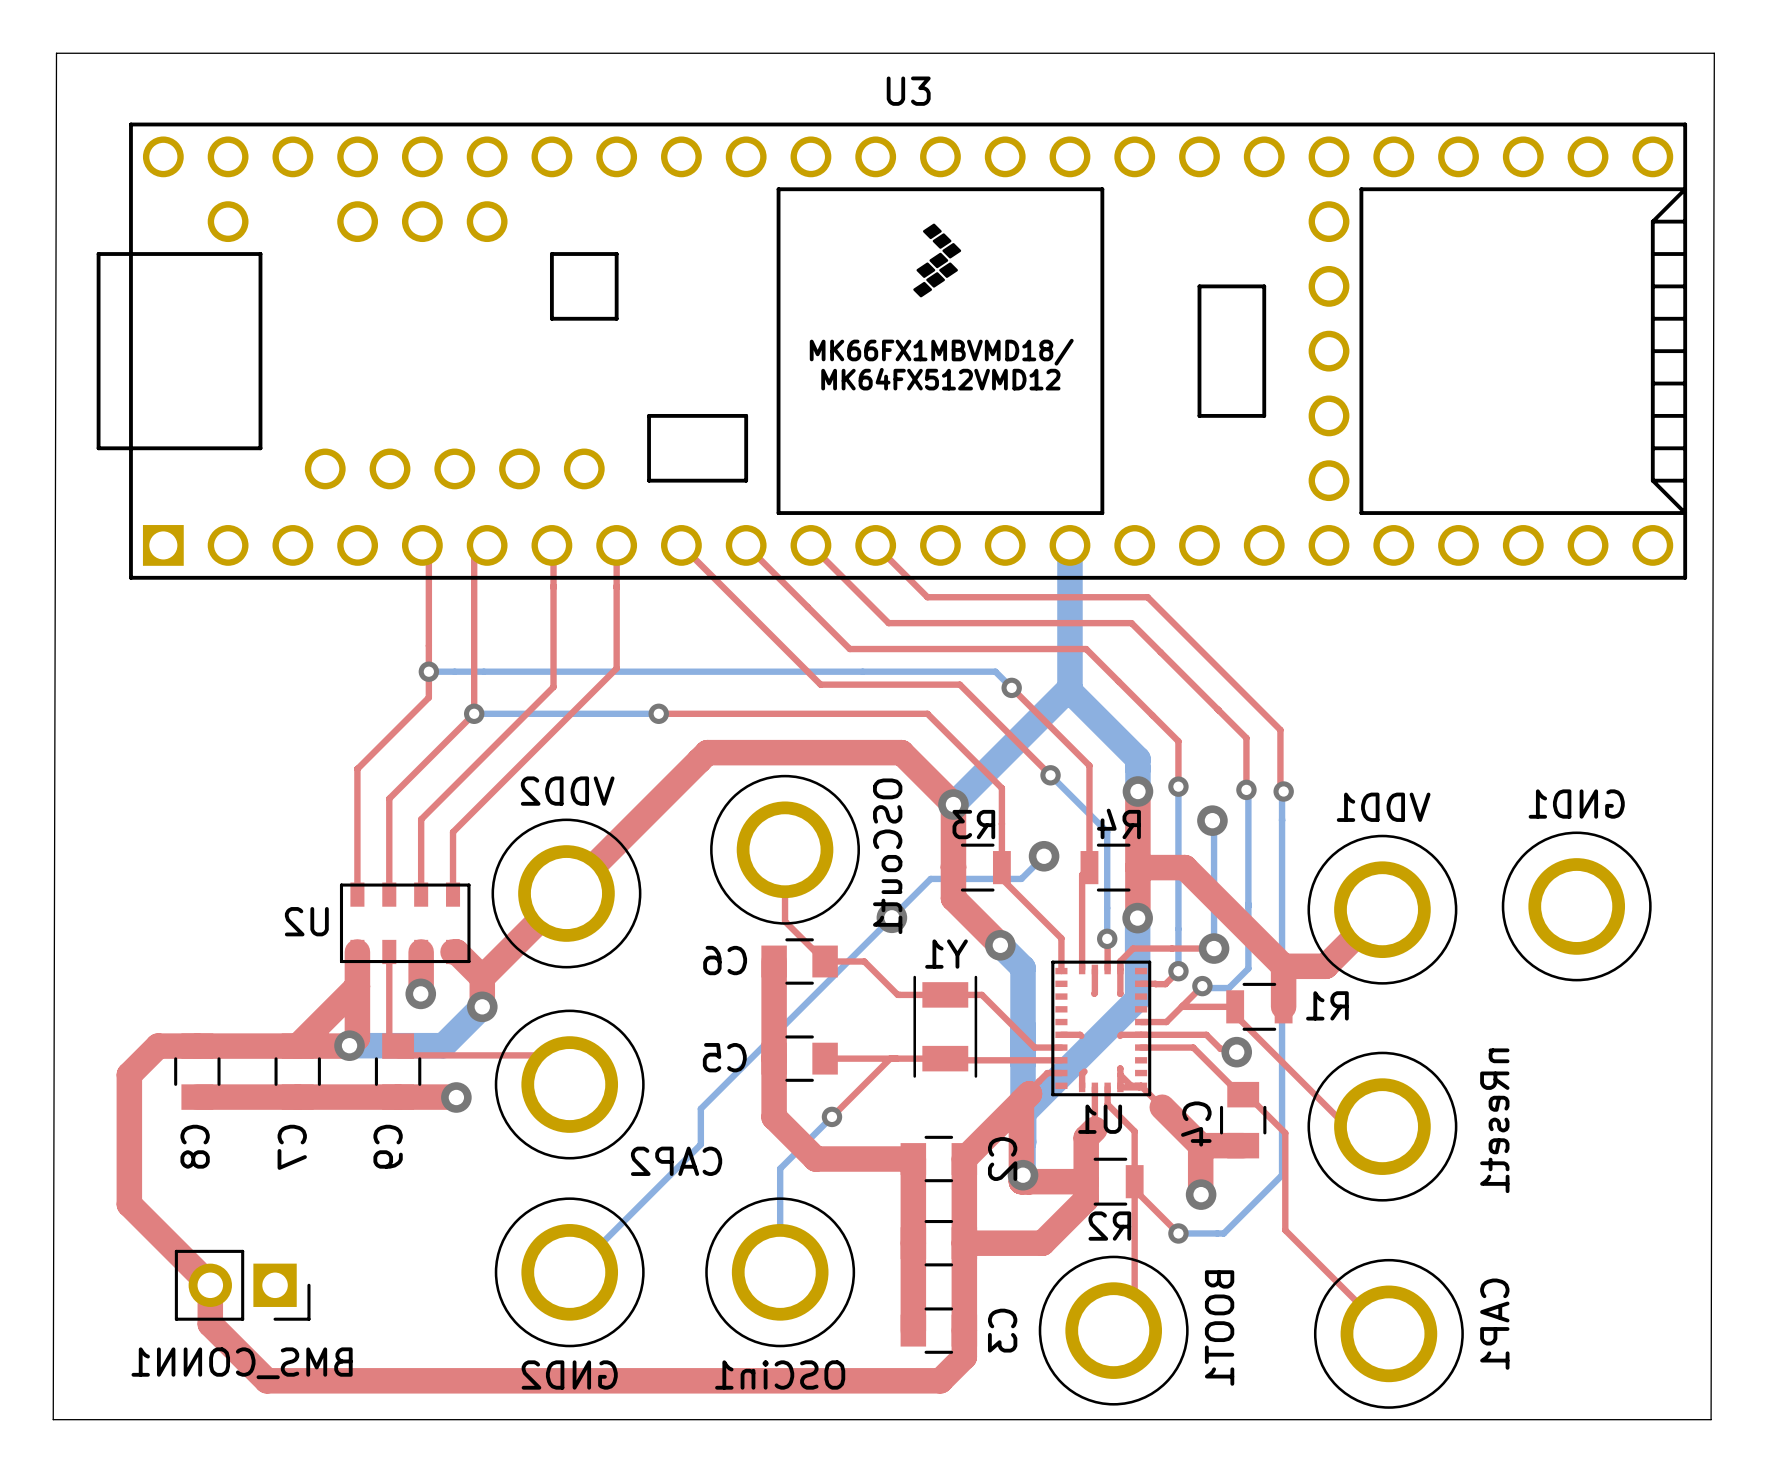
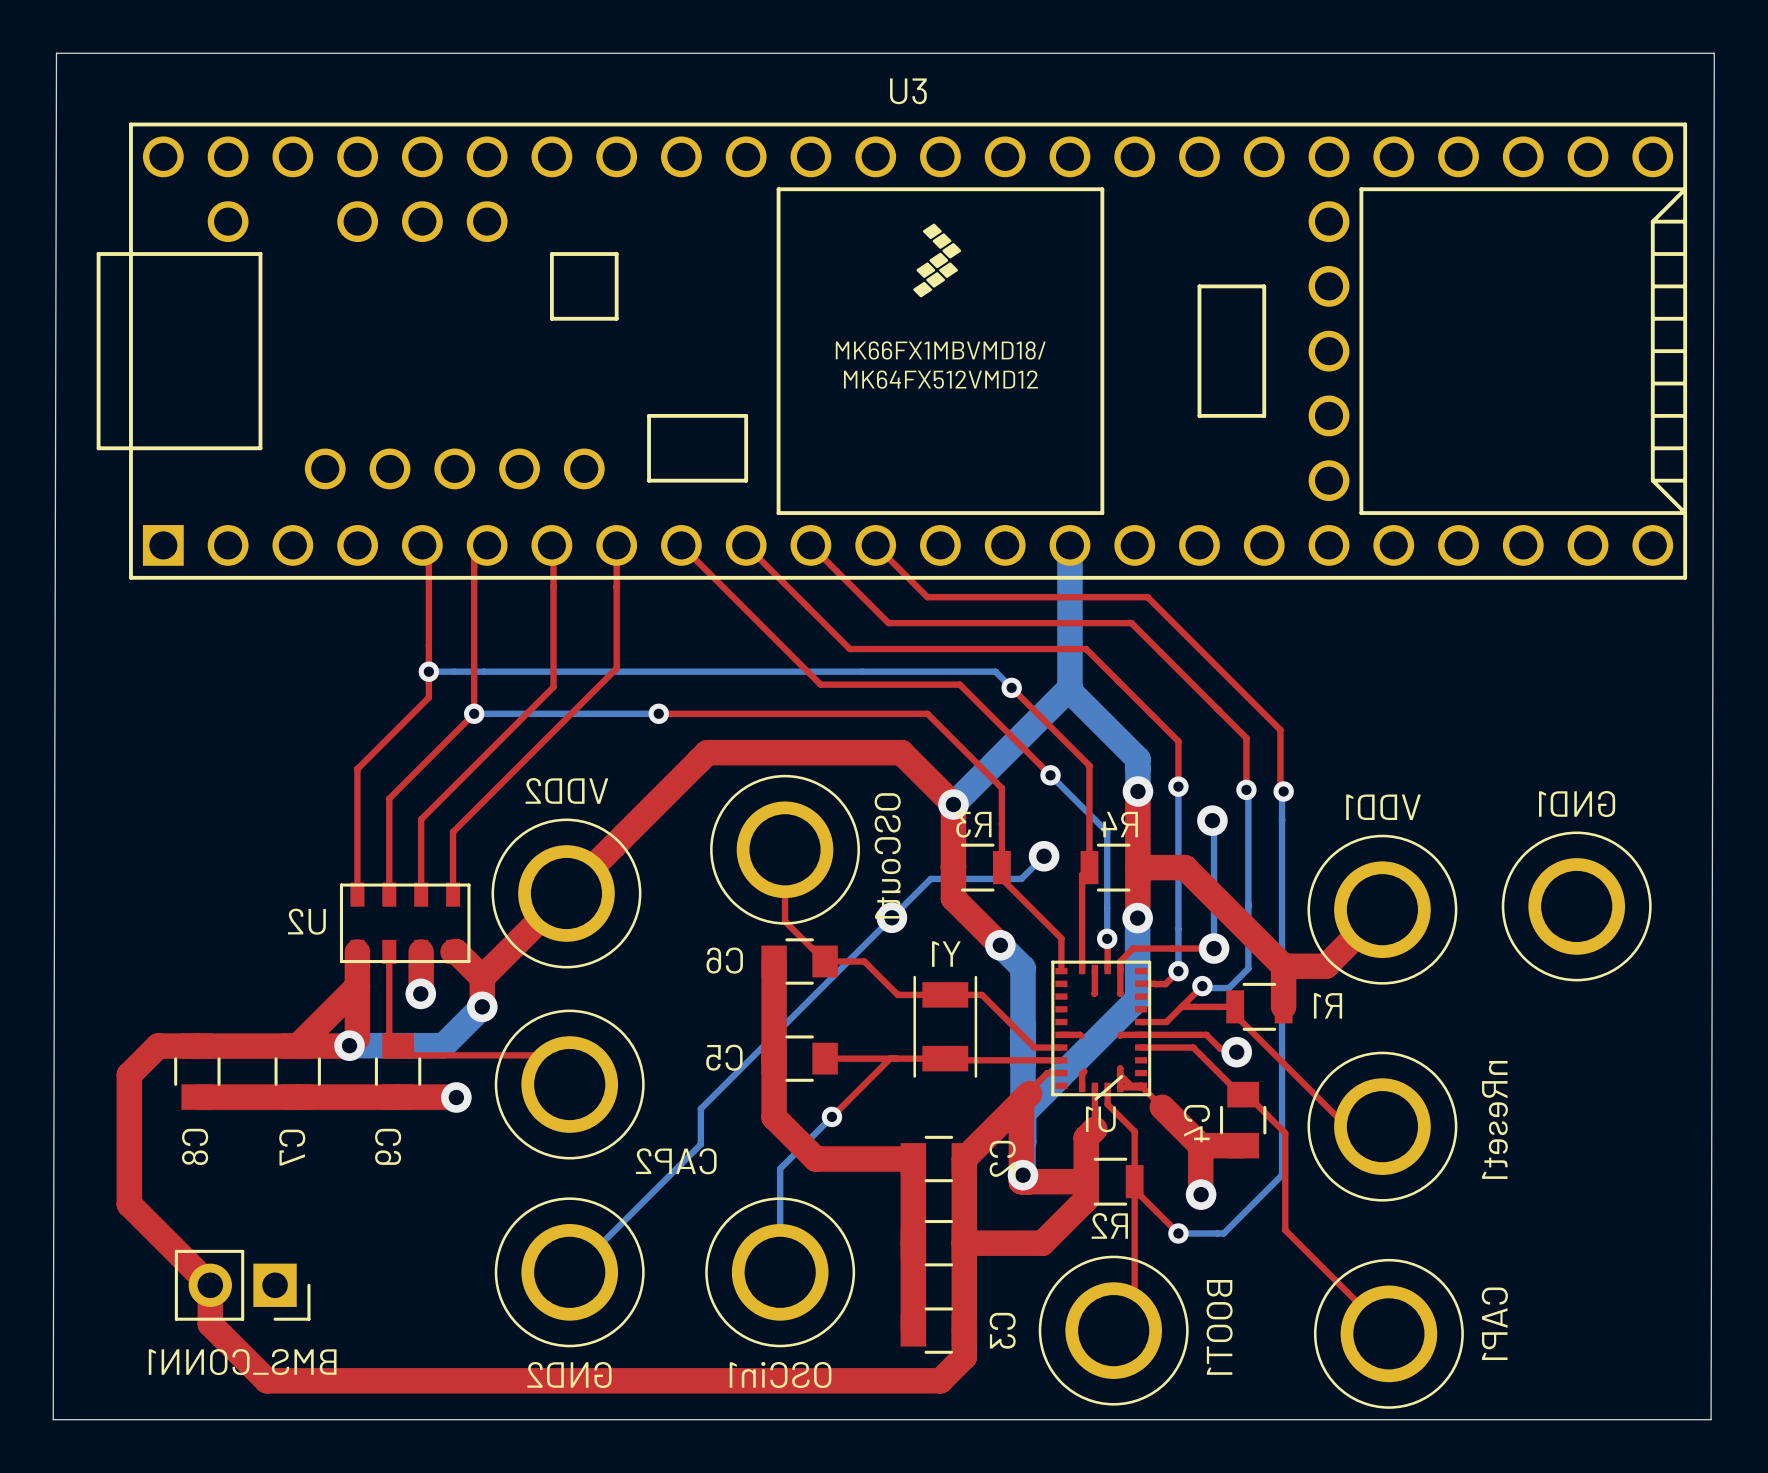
line: none -> (1121, 1076) (1095, 1099)

